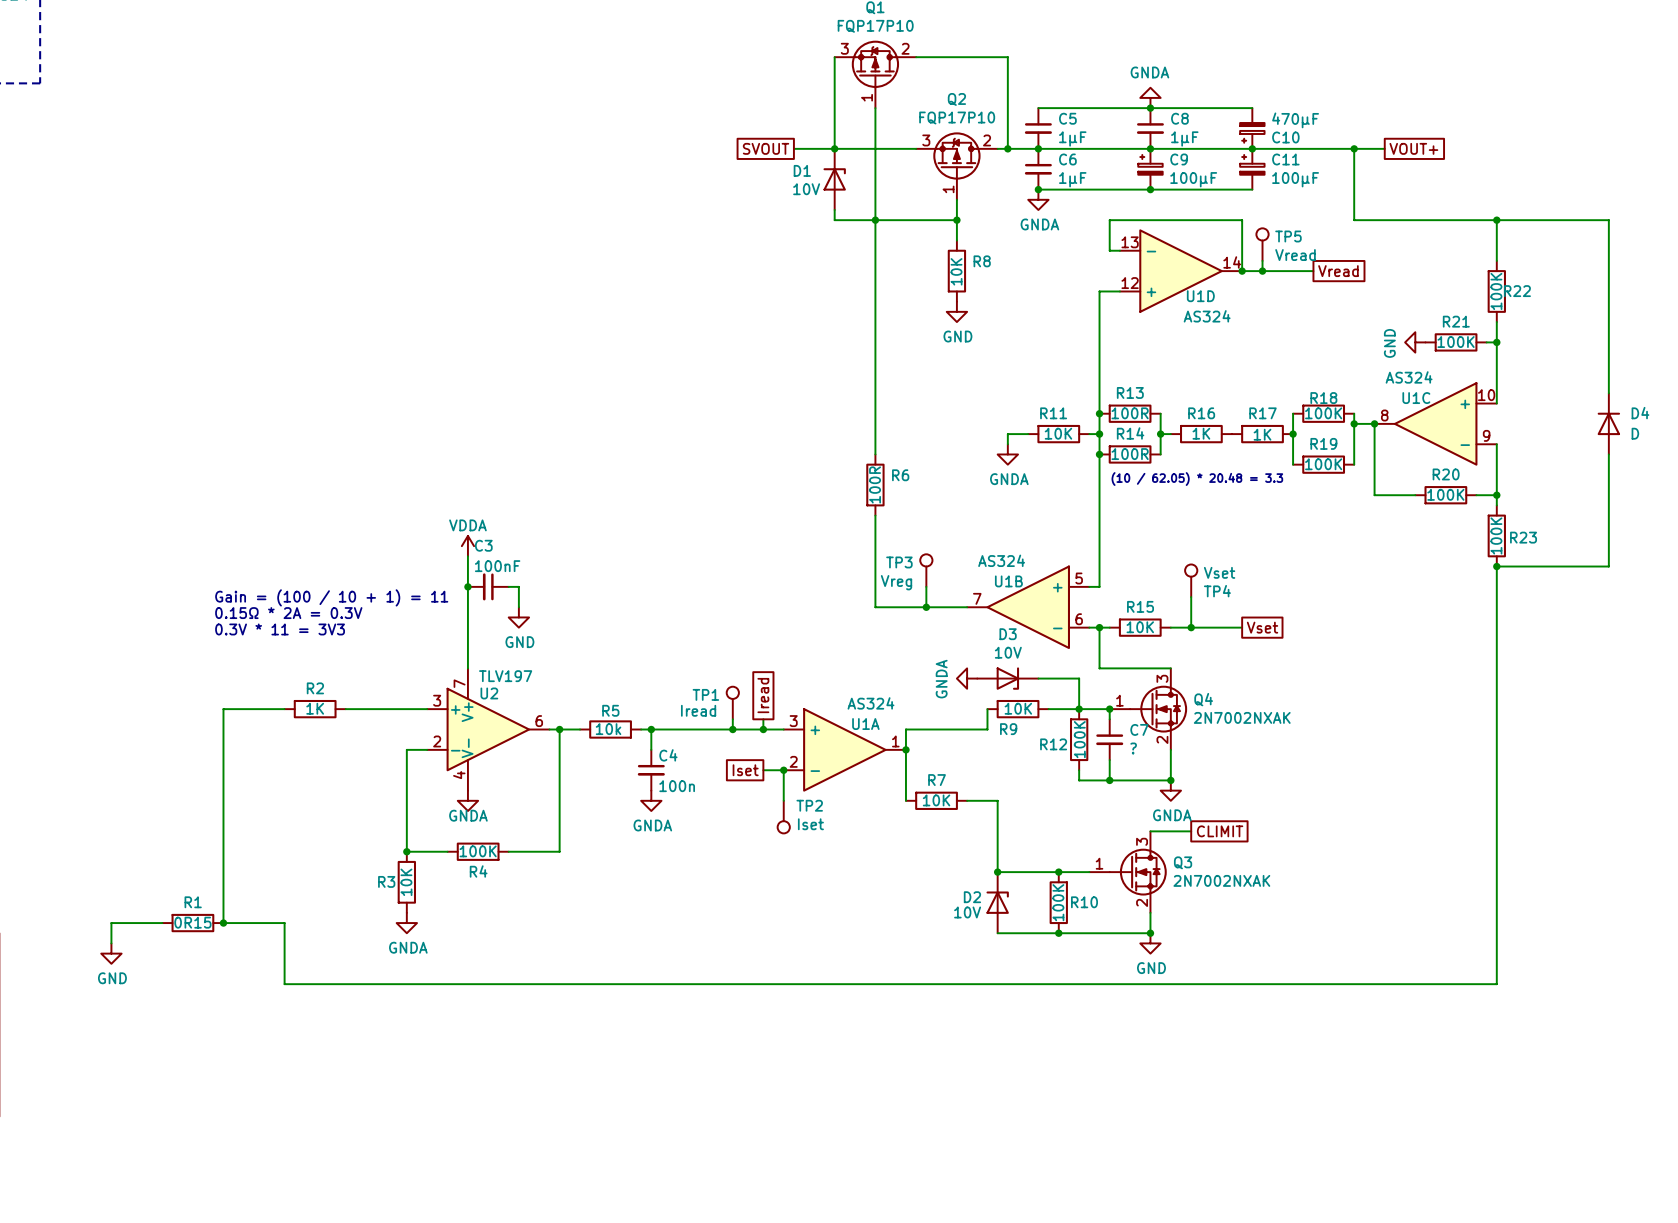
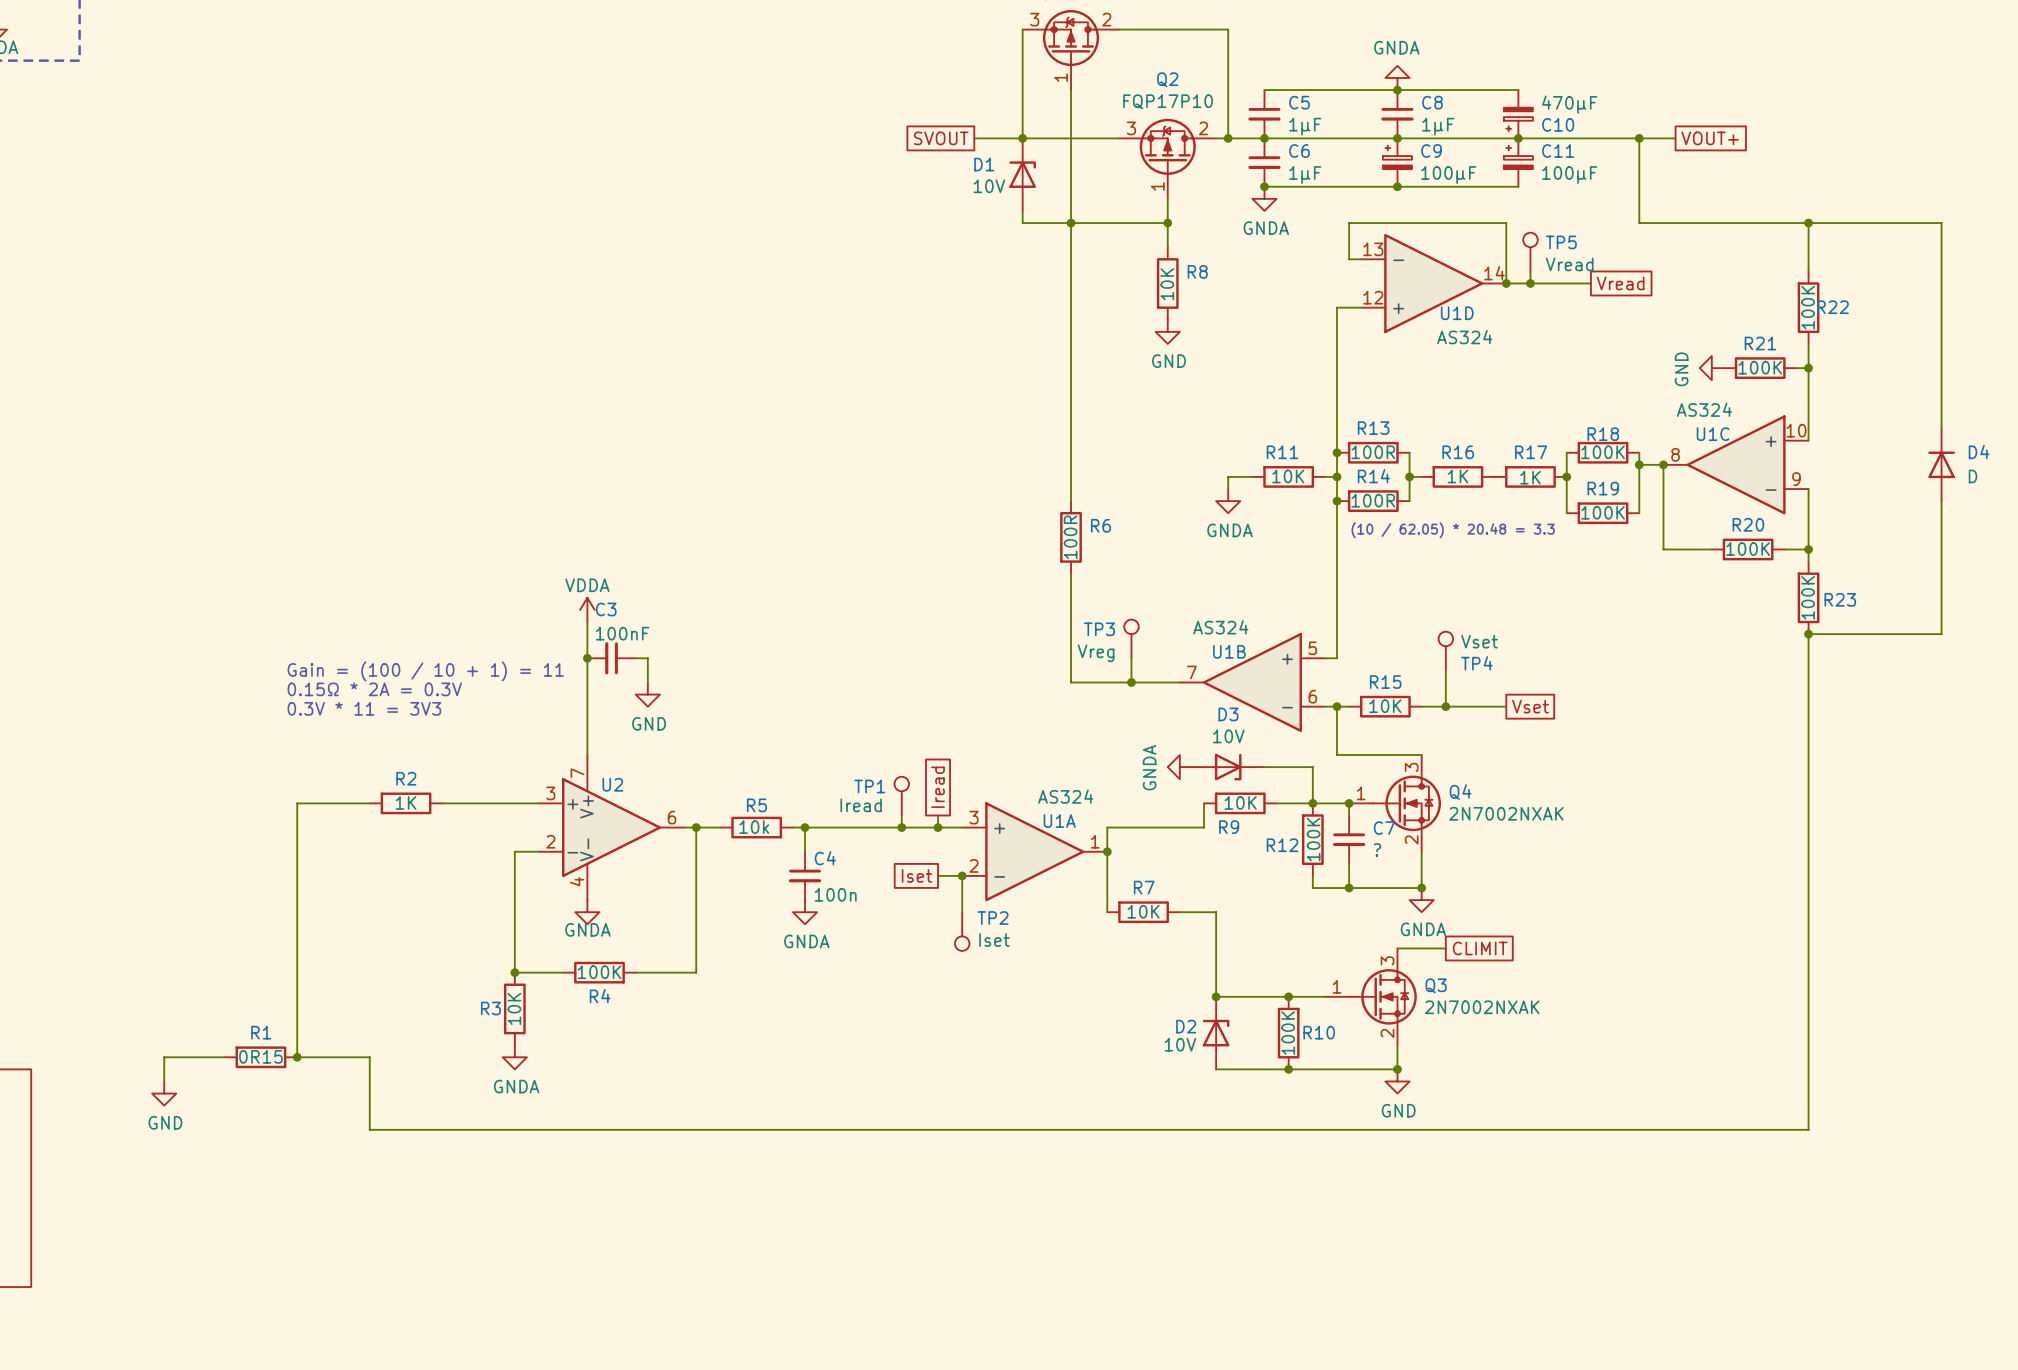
U2 value: TLV197 (505, 676) -> none

